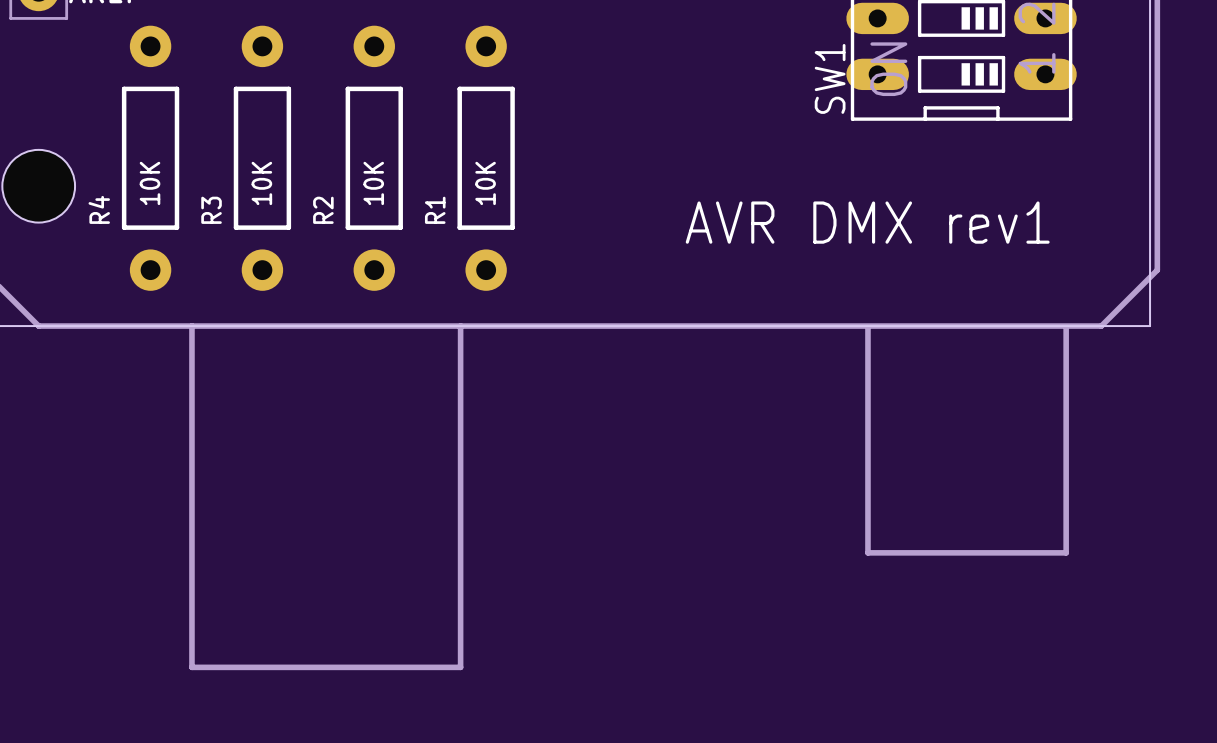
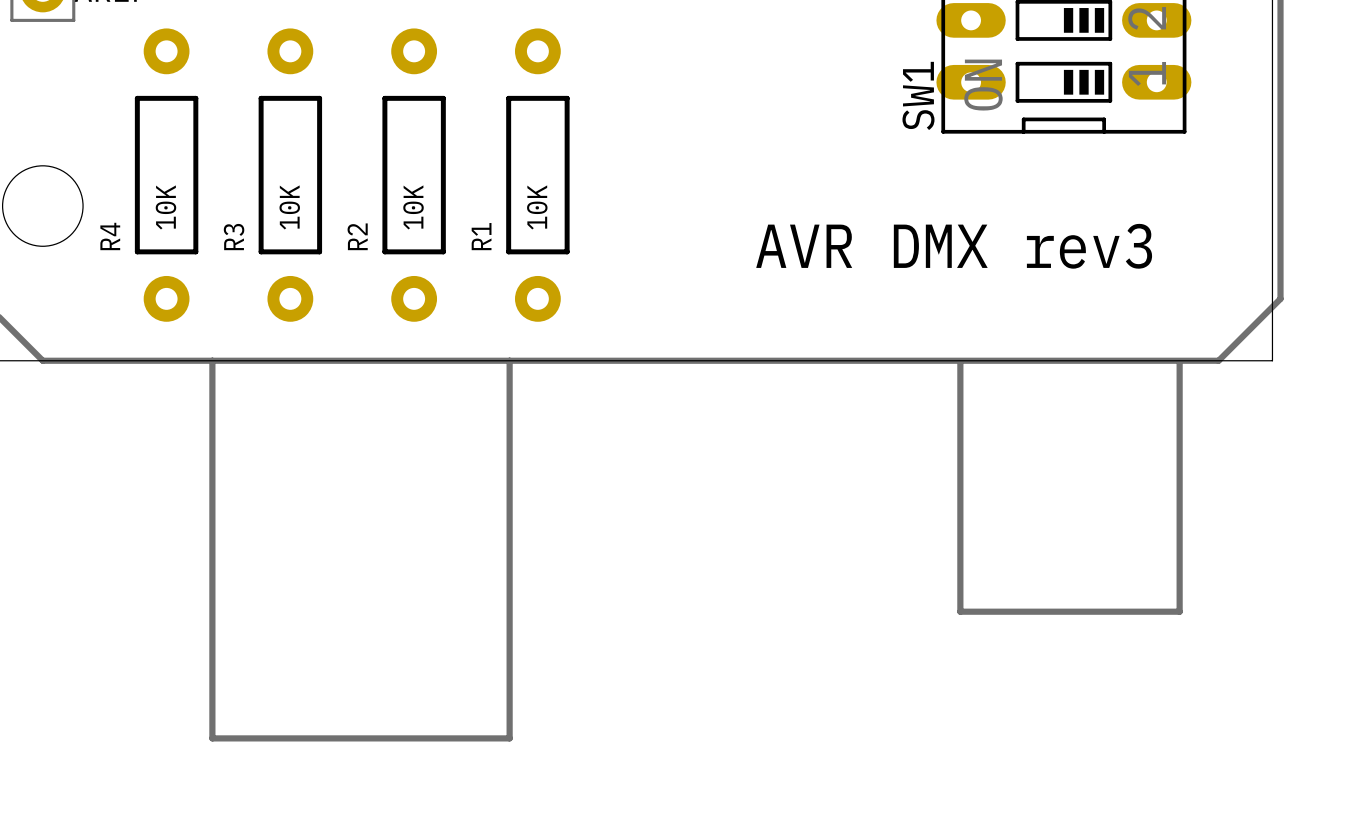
text: AVR DMX rev1 (867, 222) -> AVR DMX rev3 (954, 246)

